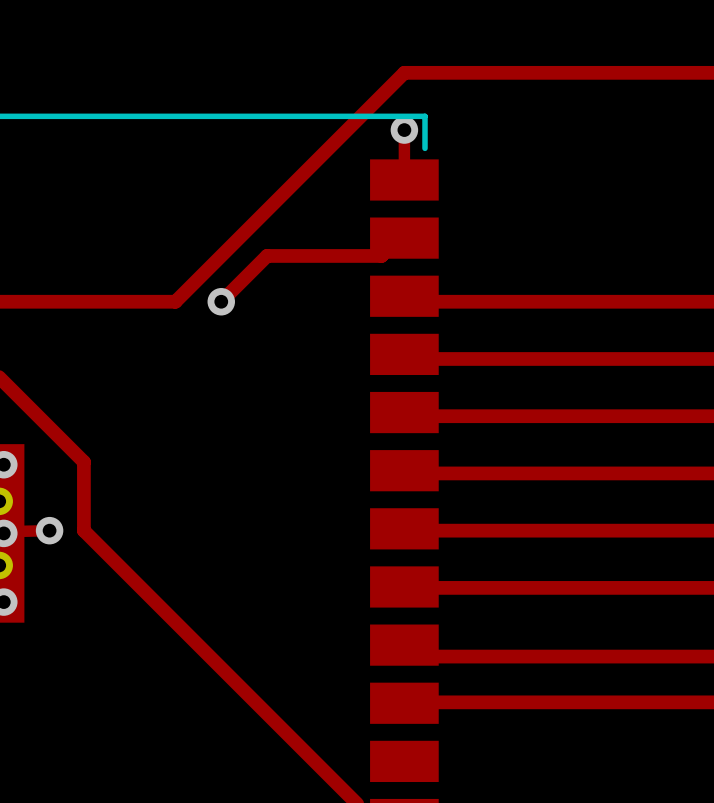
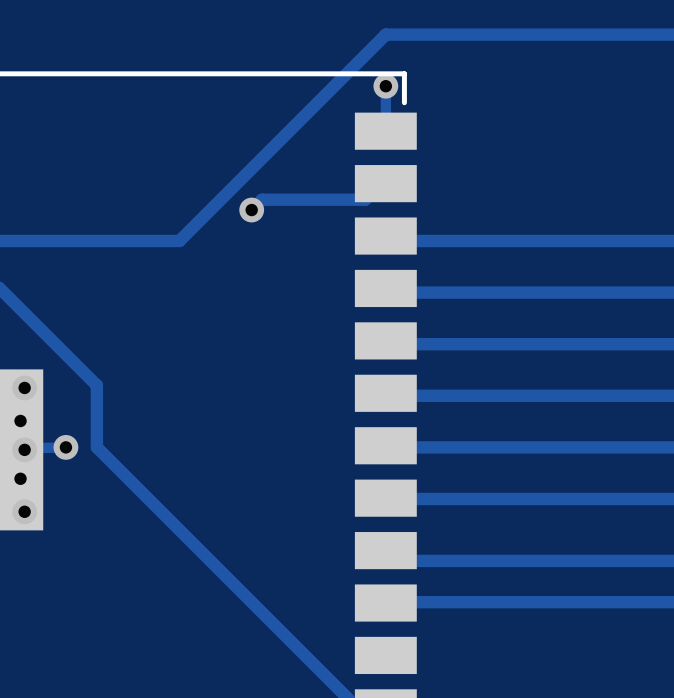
track: (255, 267) (221, 301) -> none
via position: (221, 301) -> (251, 210)

